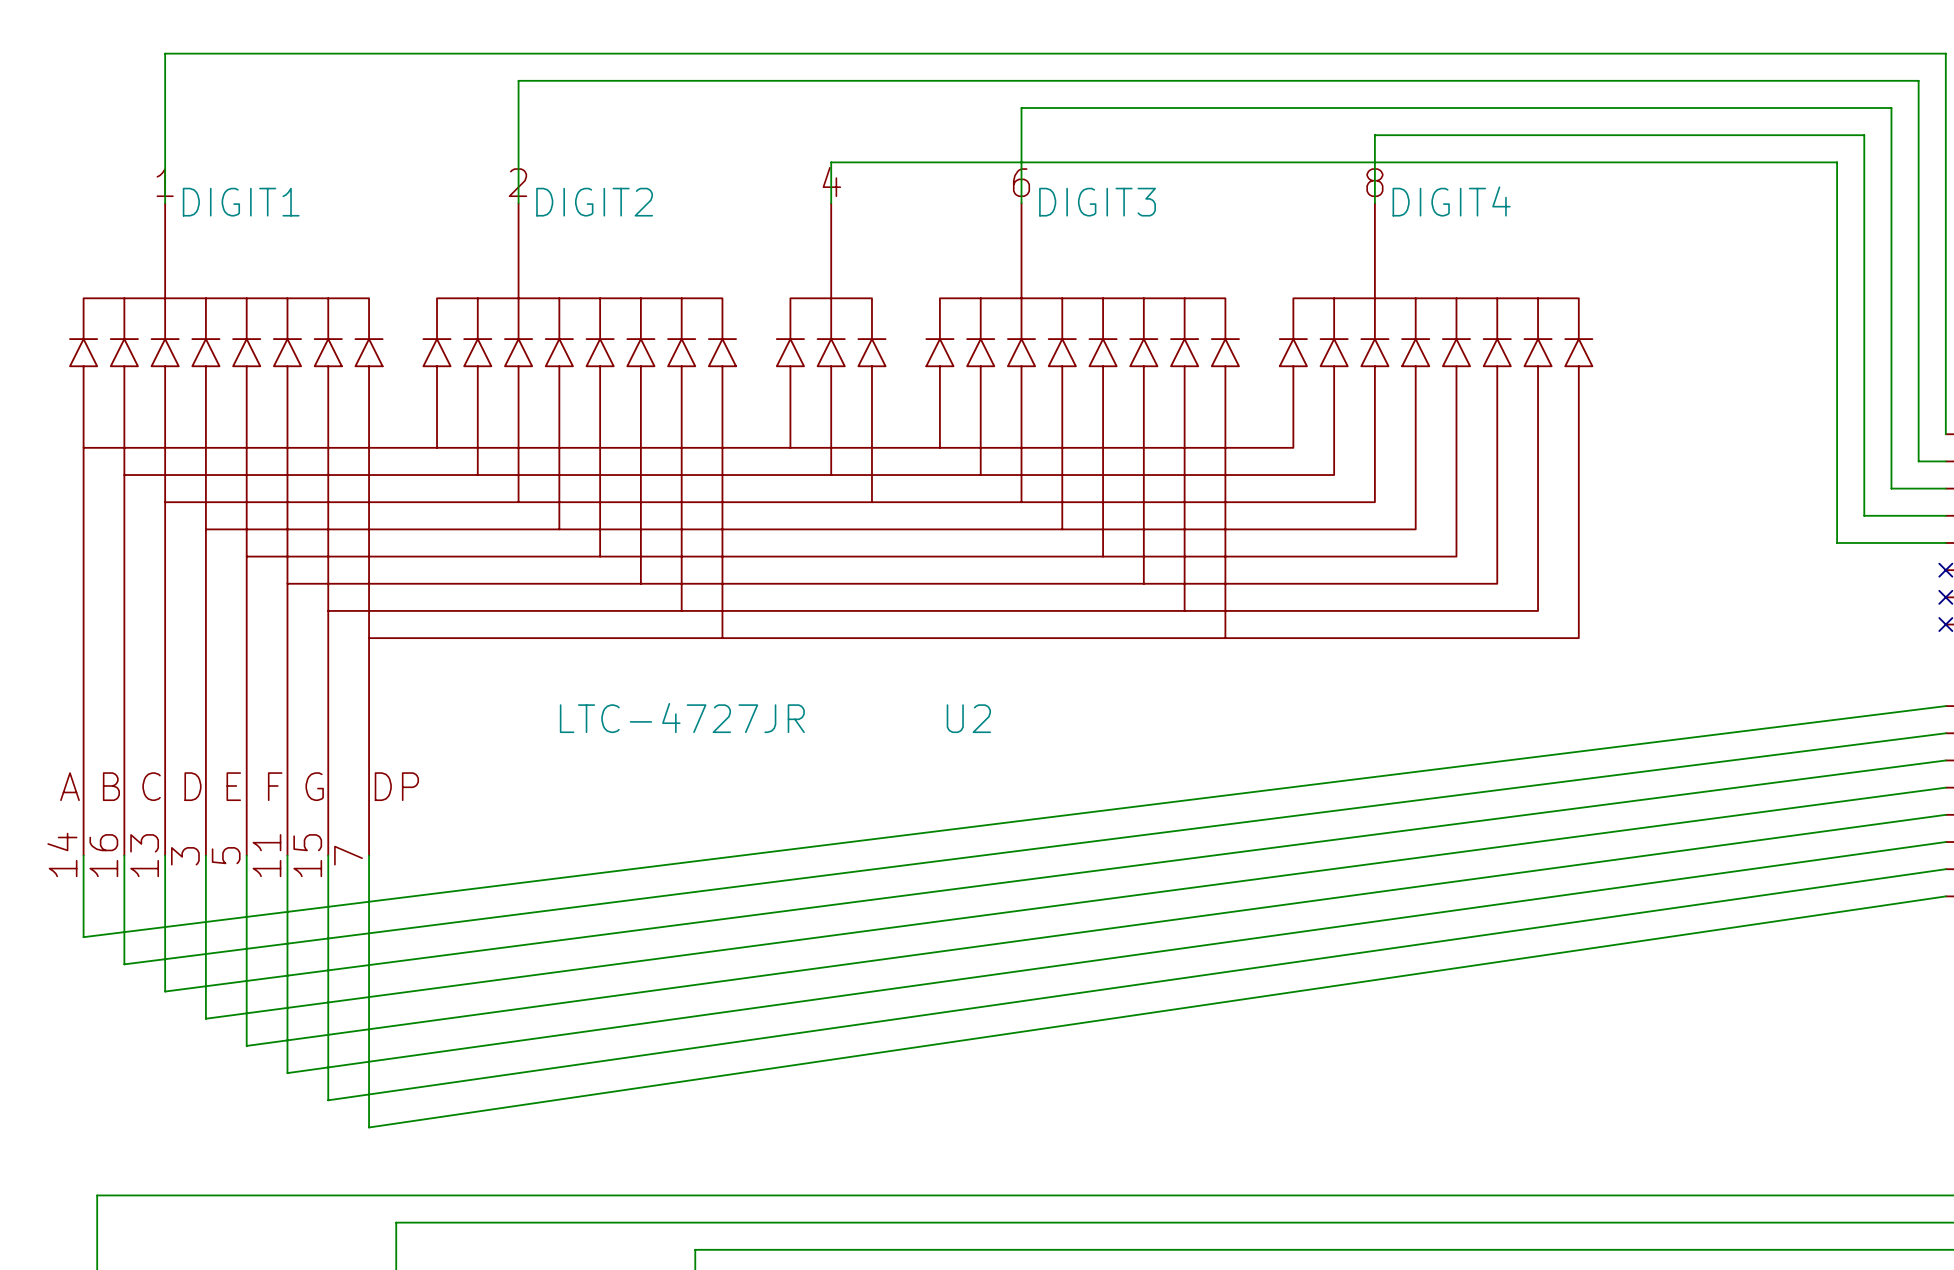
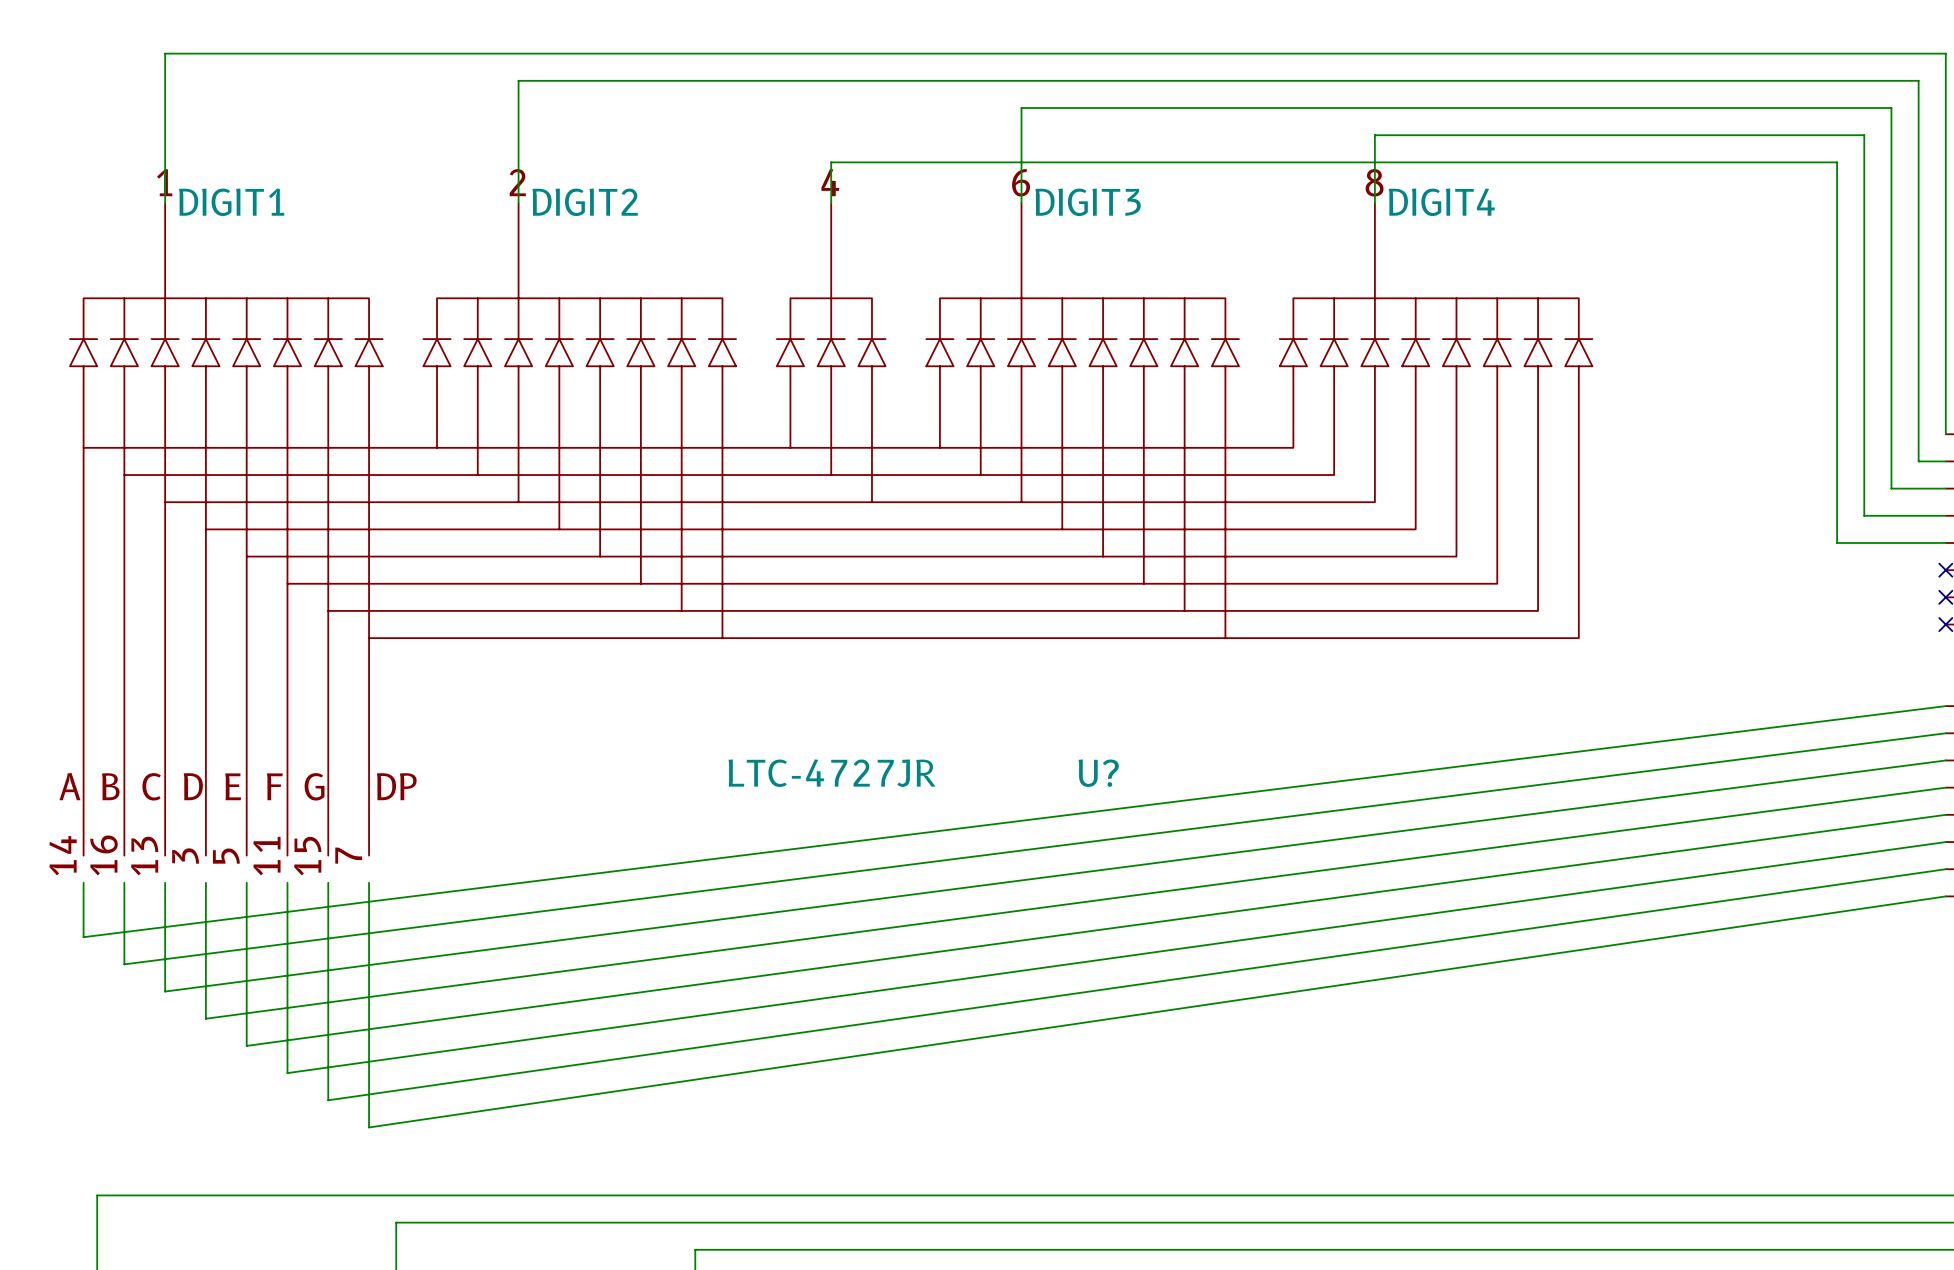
U2 value position: LTC-4727JR (682, 718) -> LTC-4727JR (832, 773)
U2 name: U2 (968, 718) -> U? (1098, 773)
wire: (83, 855) (83, 882) -> none
wire: (124, 855) (124, 882) -> none
wire: (165, 855) (165, 882) -> none
wire: (205, 855) (205, 882) -> none
wire: (246, 855) (246, 882) -> none
wire: (287, 855) (287, 882) -> none
wire: (328, 855) (328, 882) -> none
wire: (369, 855) (369, 882) -> none

